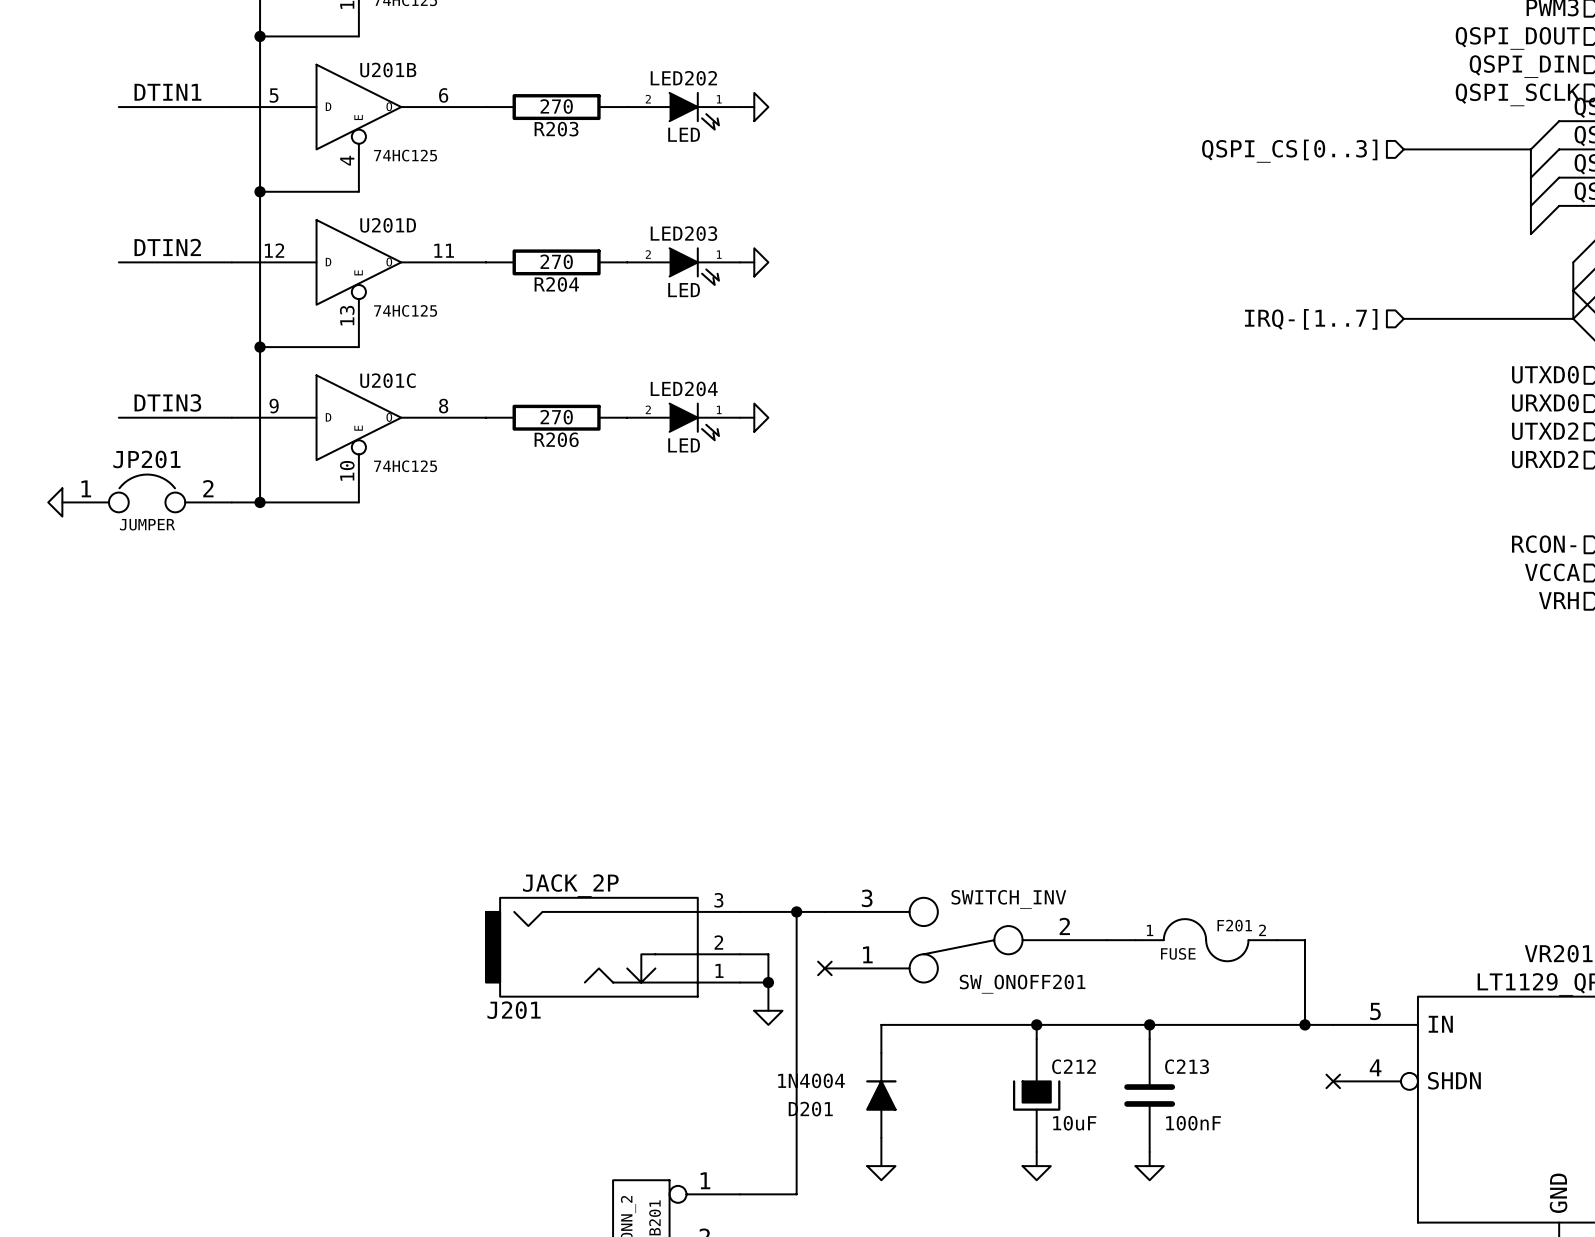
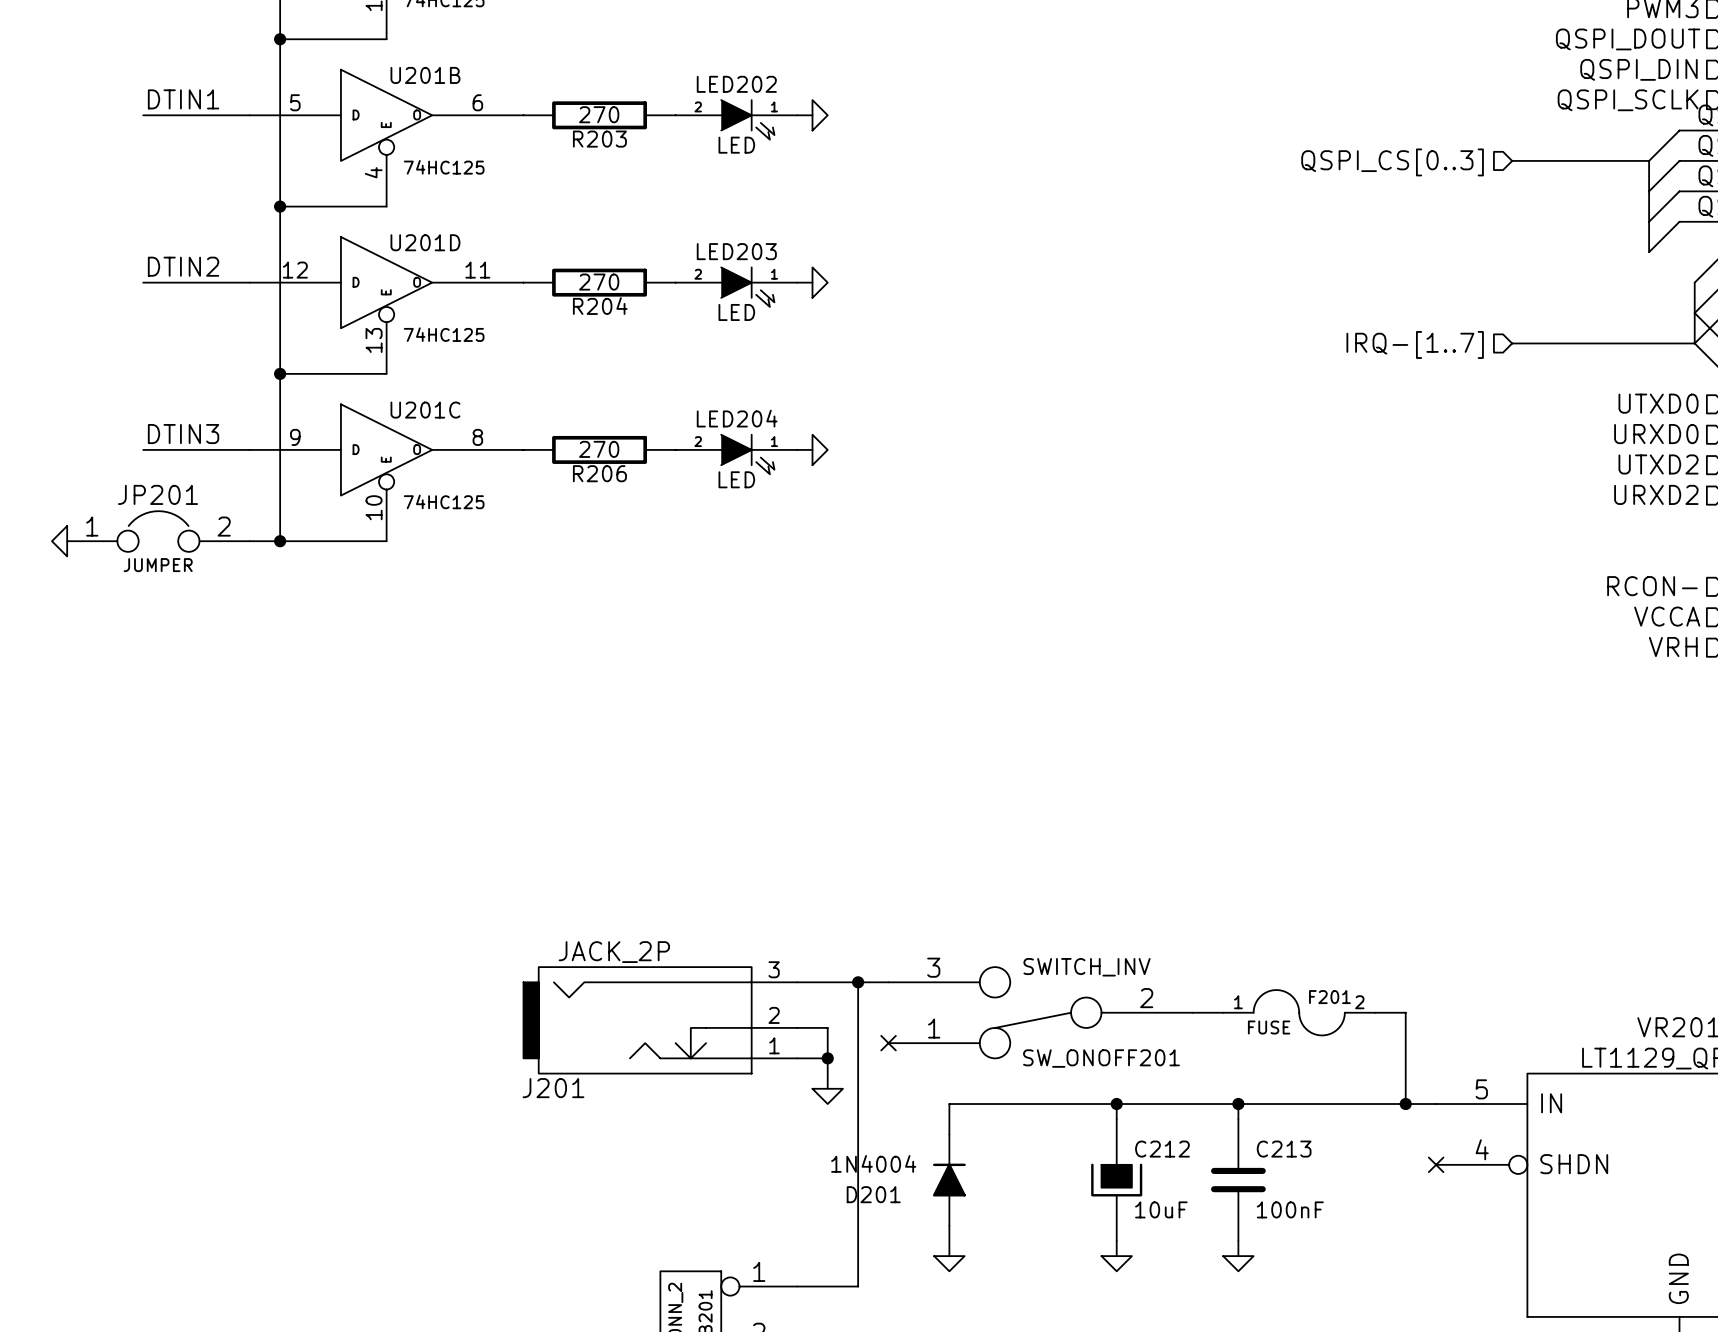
wire: (118, 107) (132, 107) -> none
wire: (118, 262) (132, 262) -> none
wire: (118, 417) (132, 417) -> none

